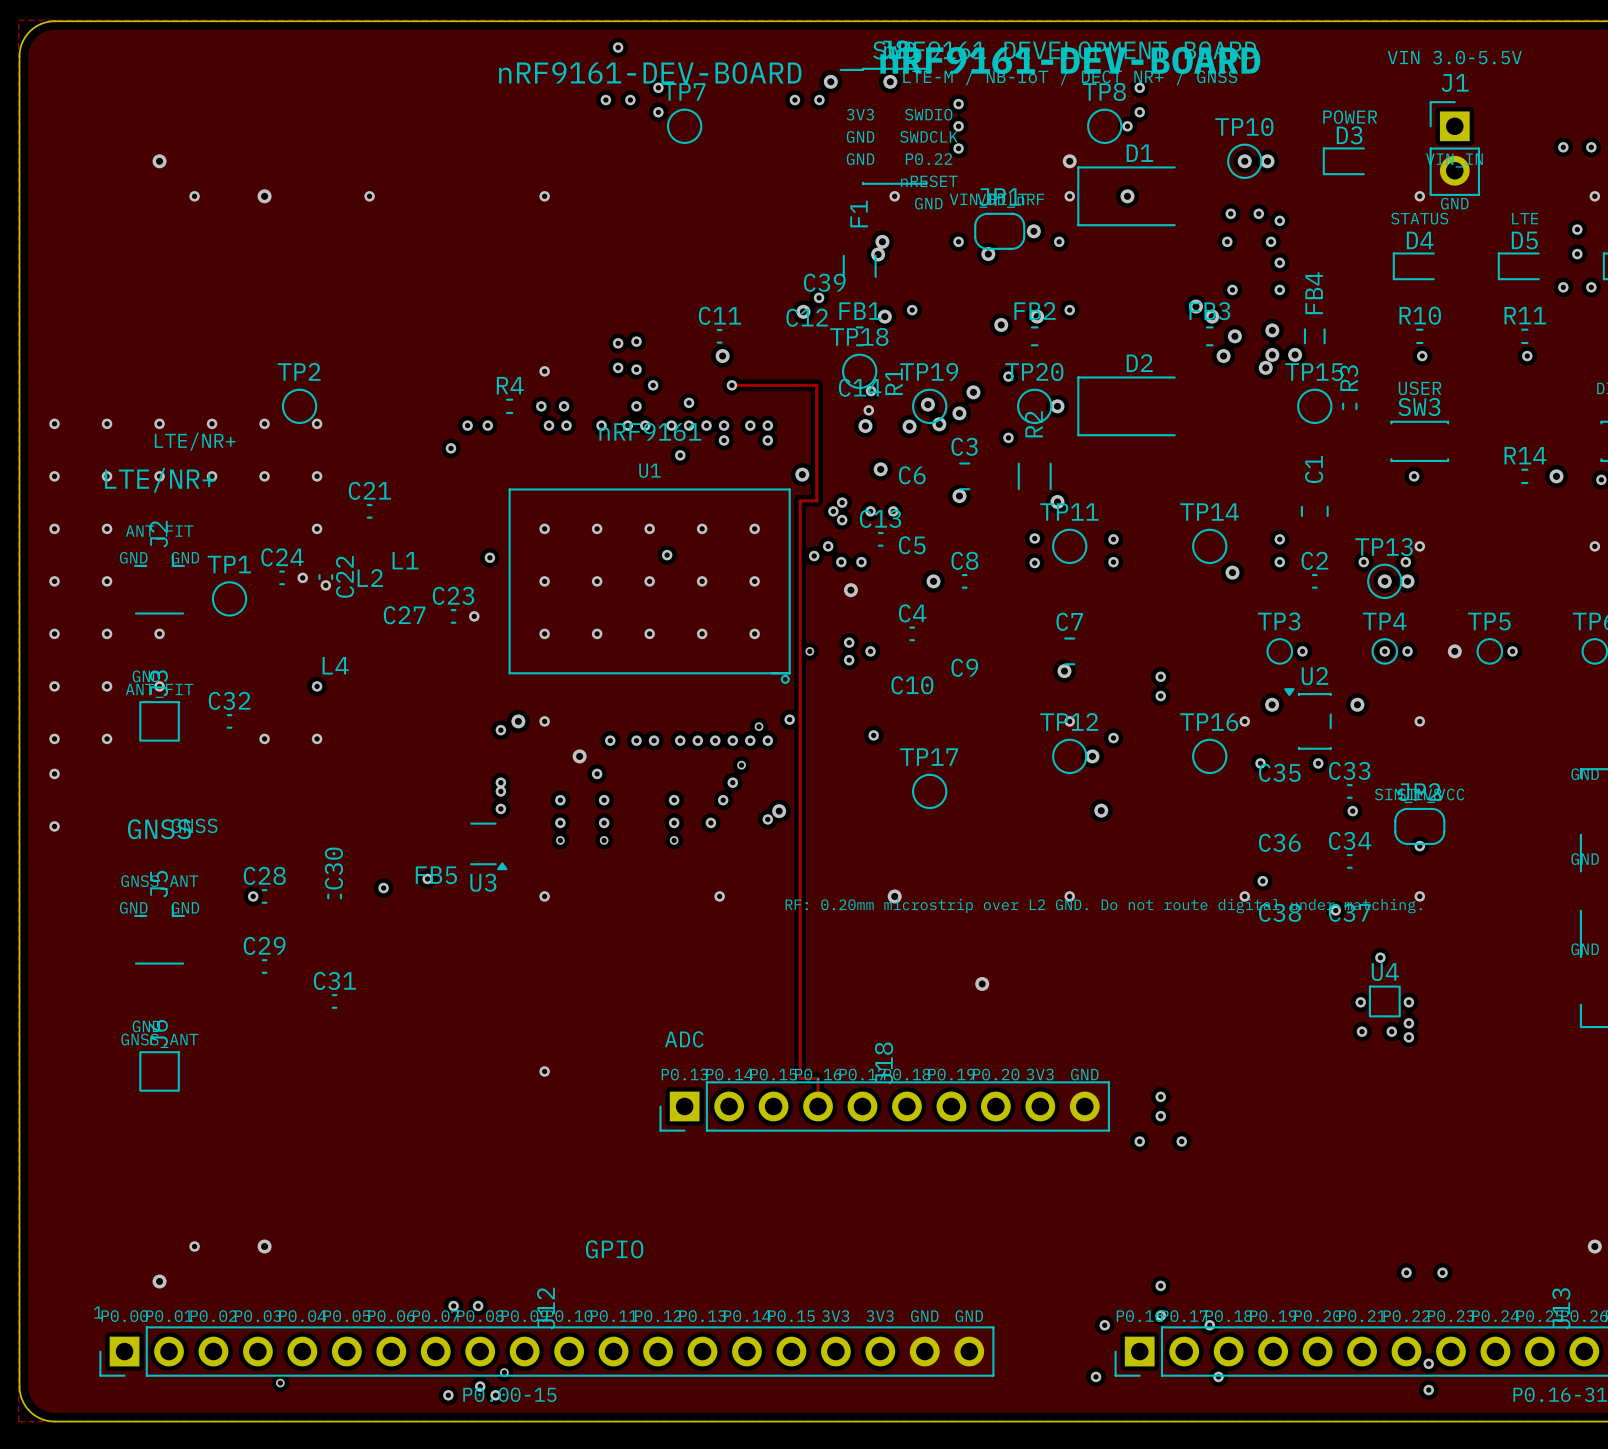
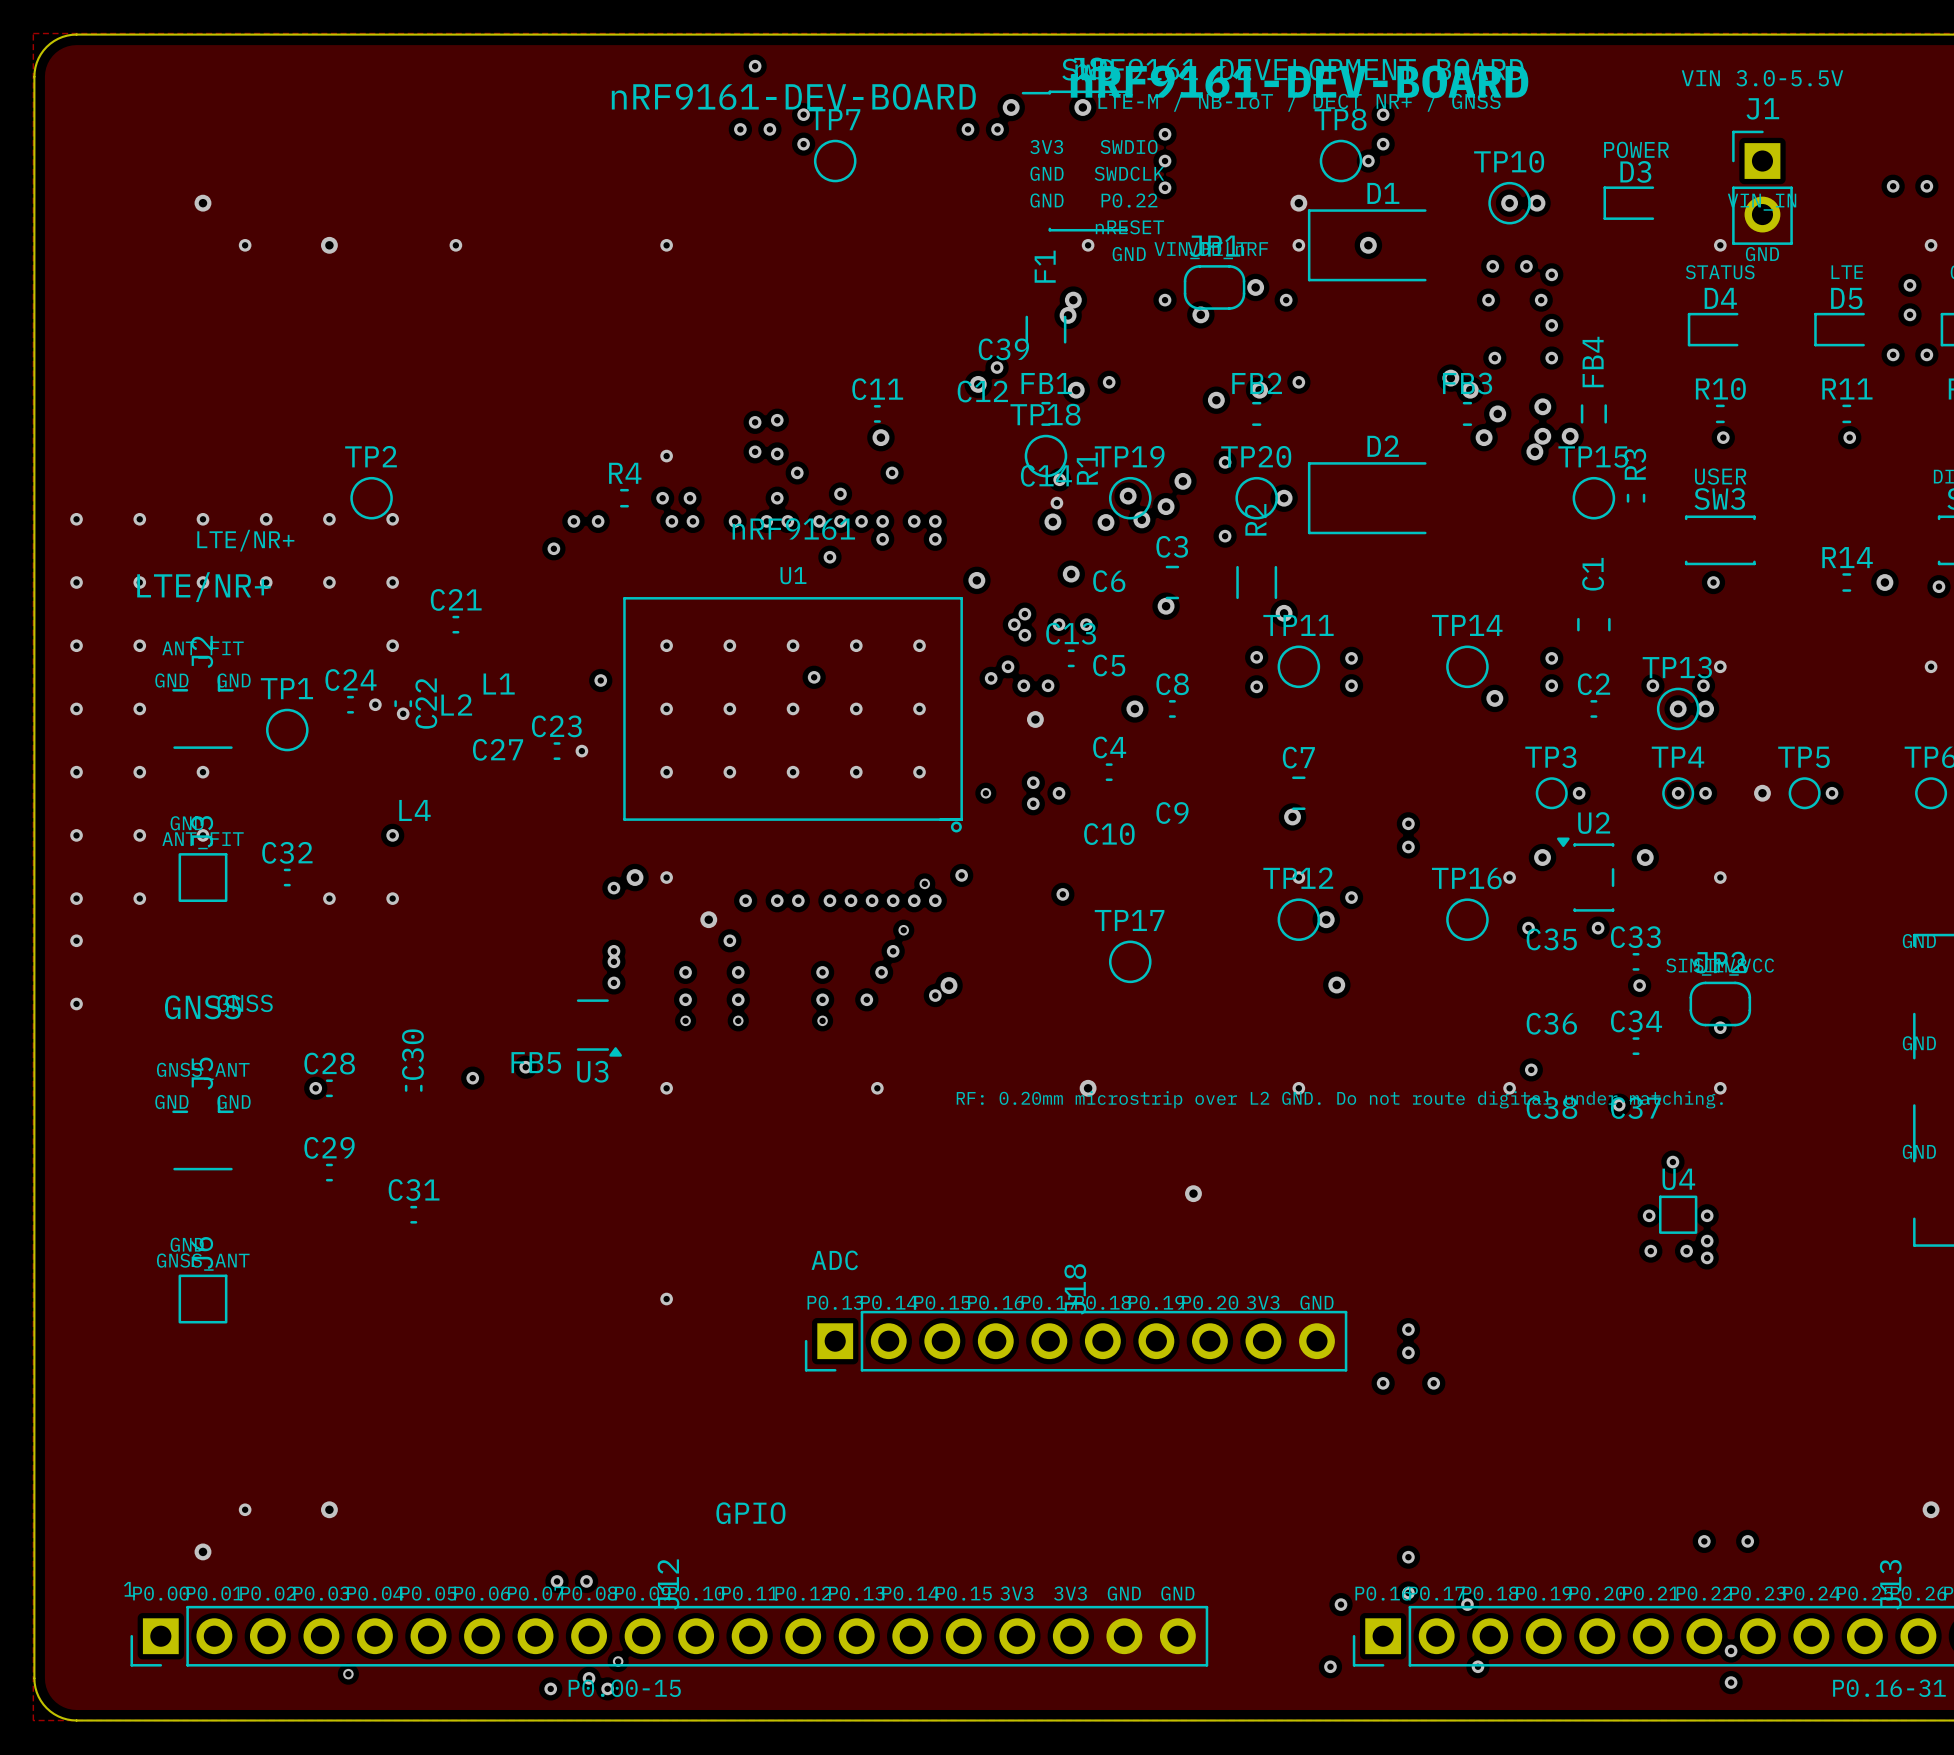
track: (731, 385) (816, 385) (816, 500) (800, 500) (800, 1078) (818, 1078) (818, 1090) -> none

